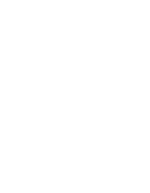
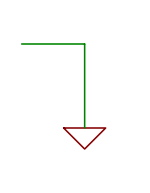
wire: none -> (21, 43) (84, 43) (84, 127)
power symbol: none -> (84, 138)

